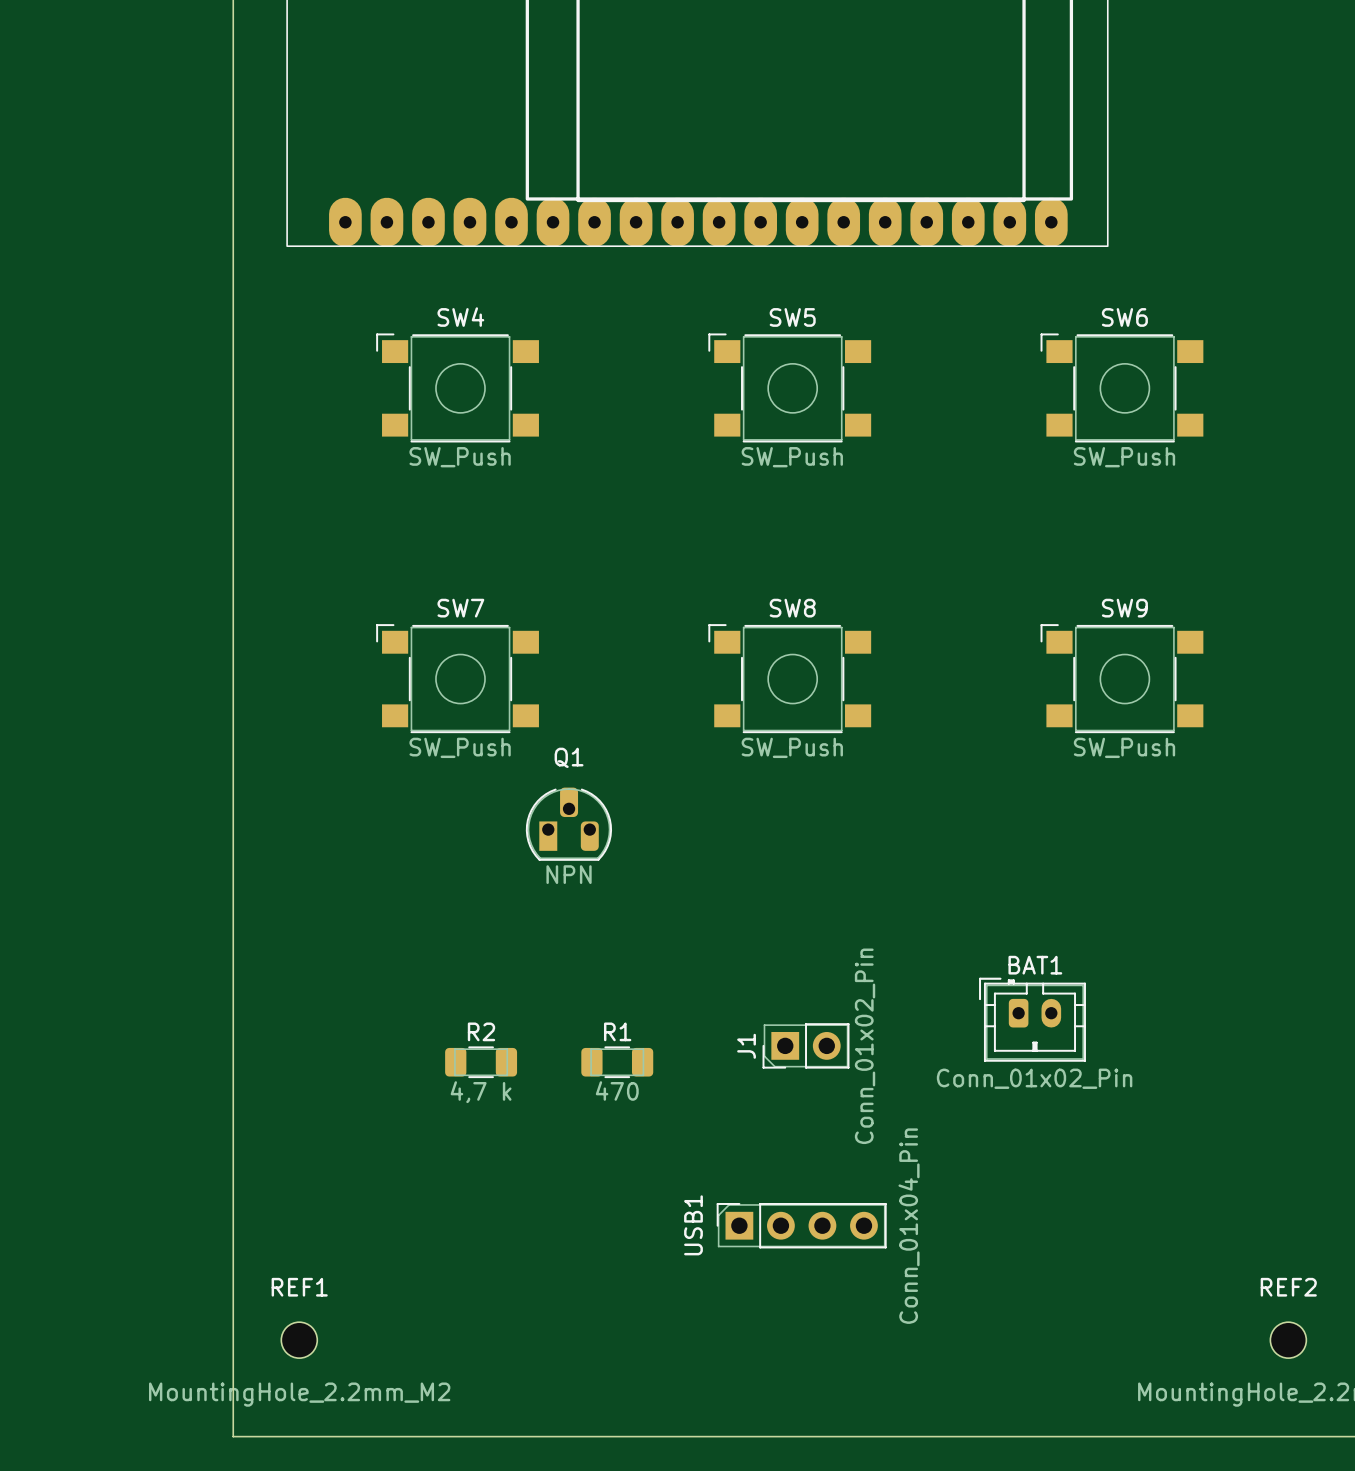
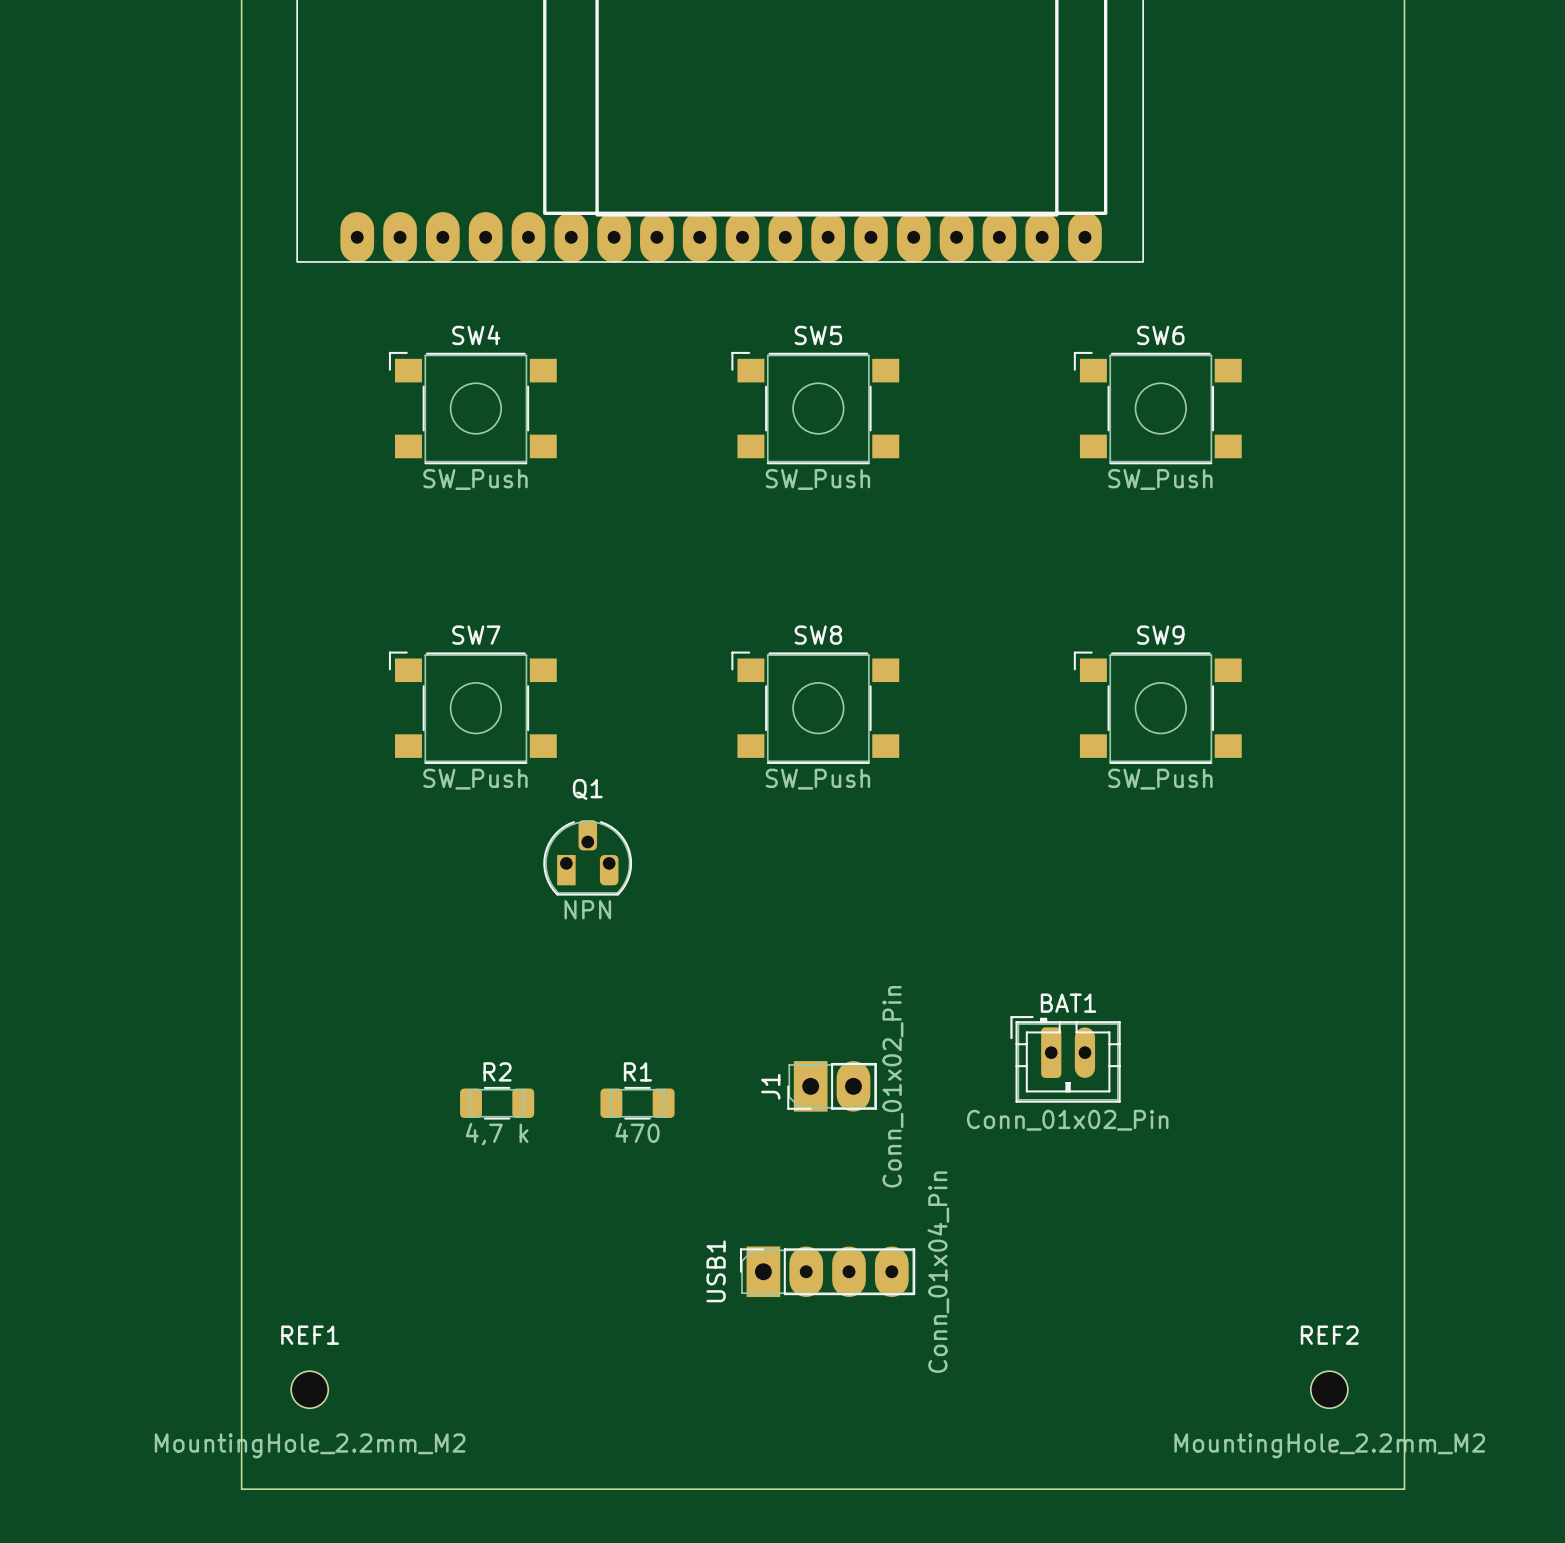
BAT1 footprint: [979, 977, 1086, 1062] -> [1010, 1016, 1121, 1103]
J1 footprint: [762, 1023, 850, 1069] -> [787, 1061, 877, 1112]
USB1 footprint: [716, 1203, 887, 1249] -> [739, 1246, 916, 1298]

